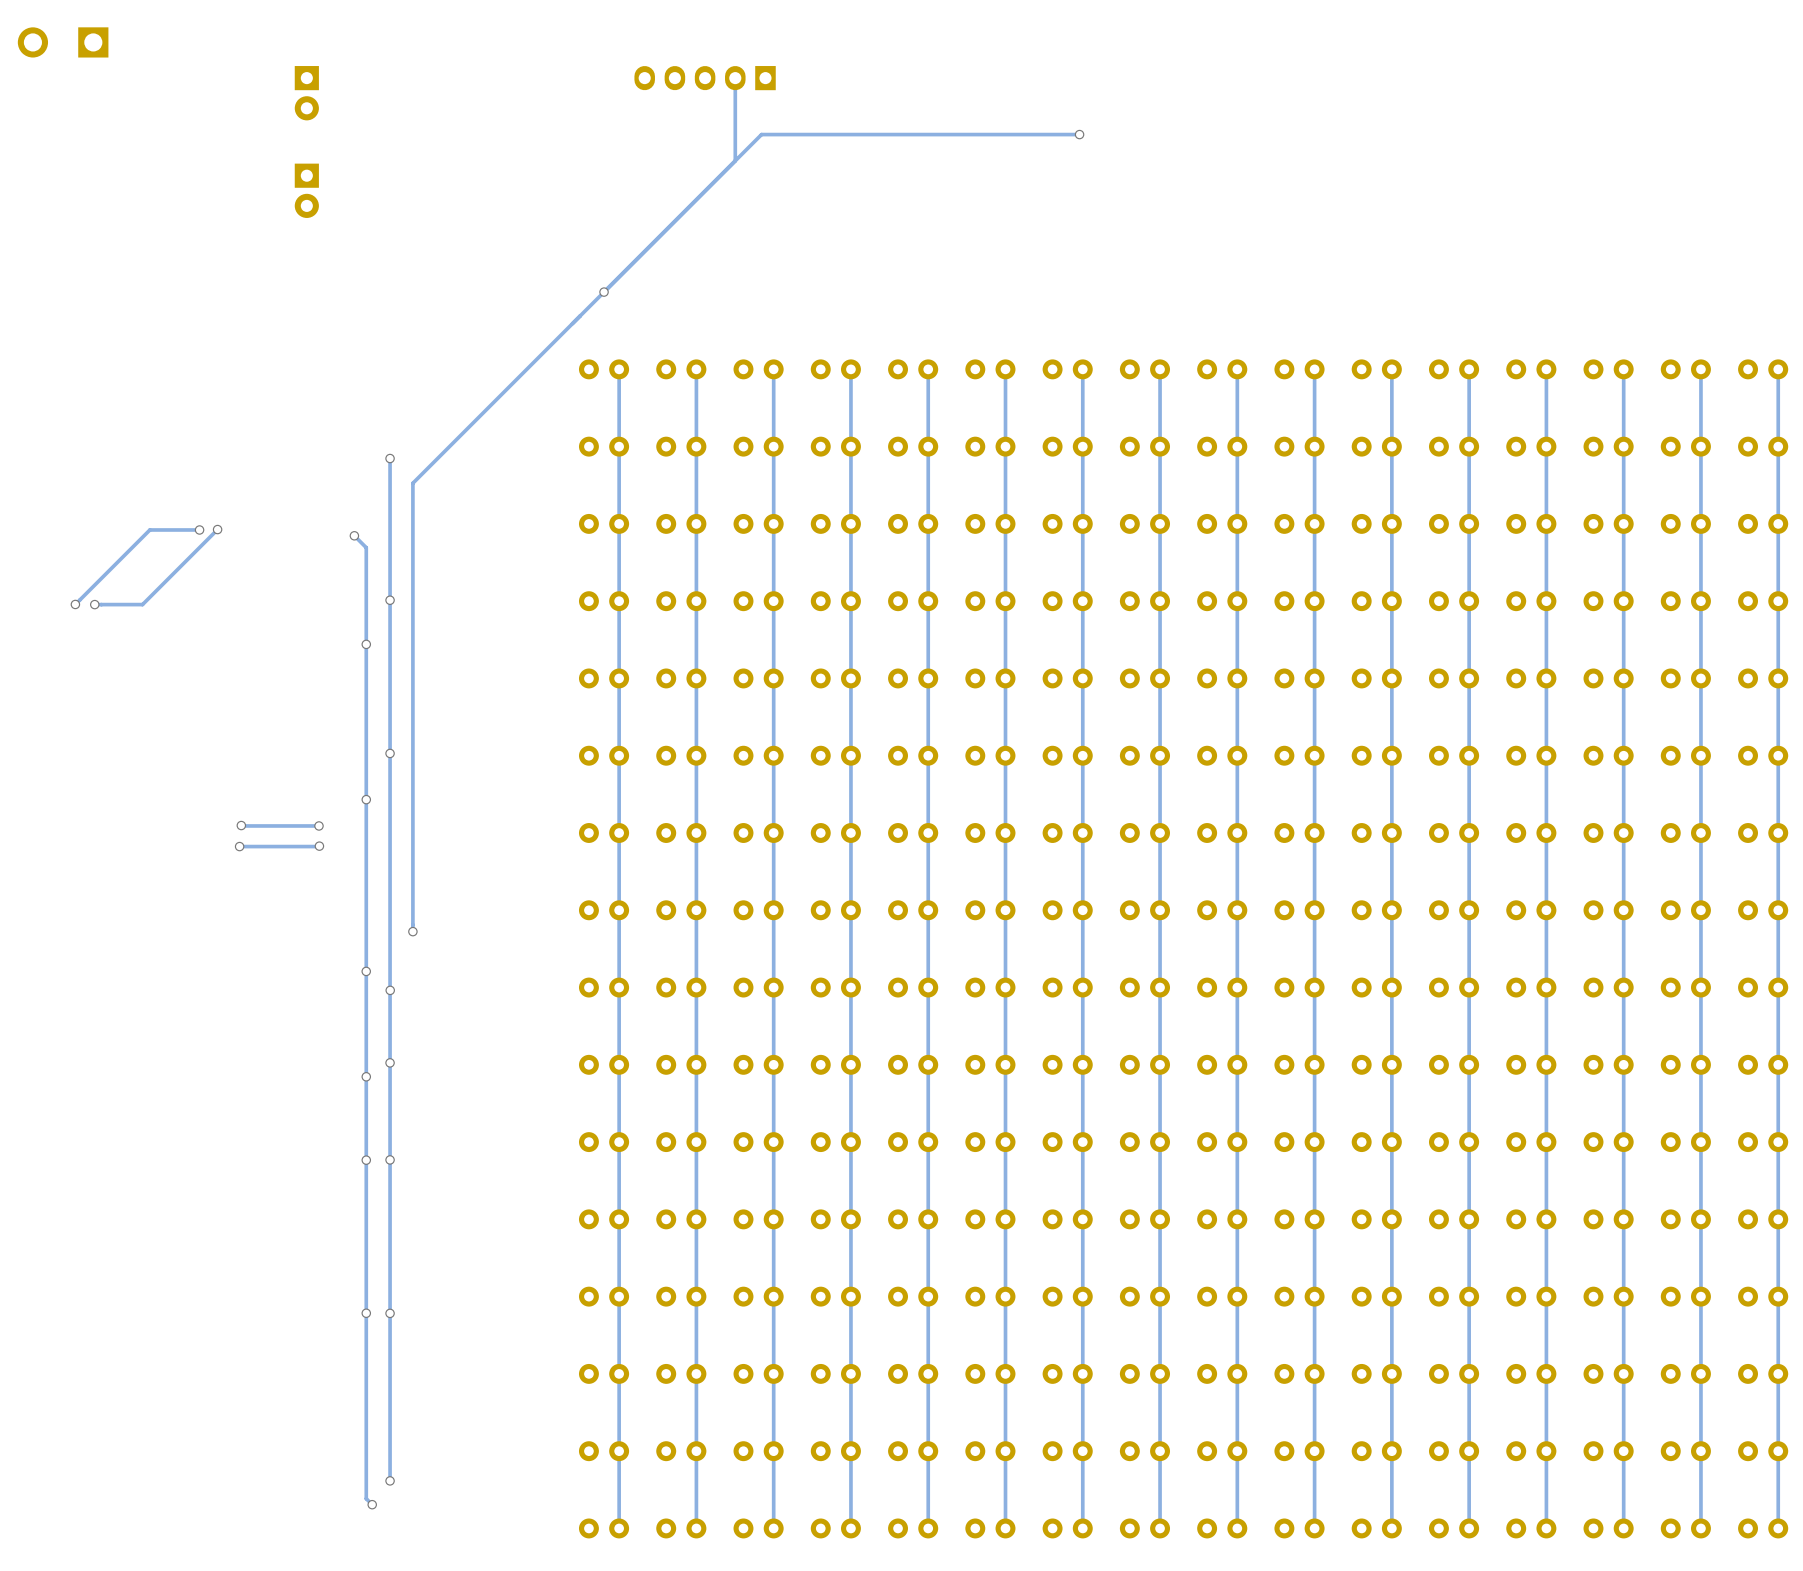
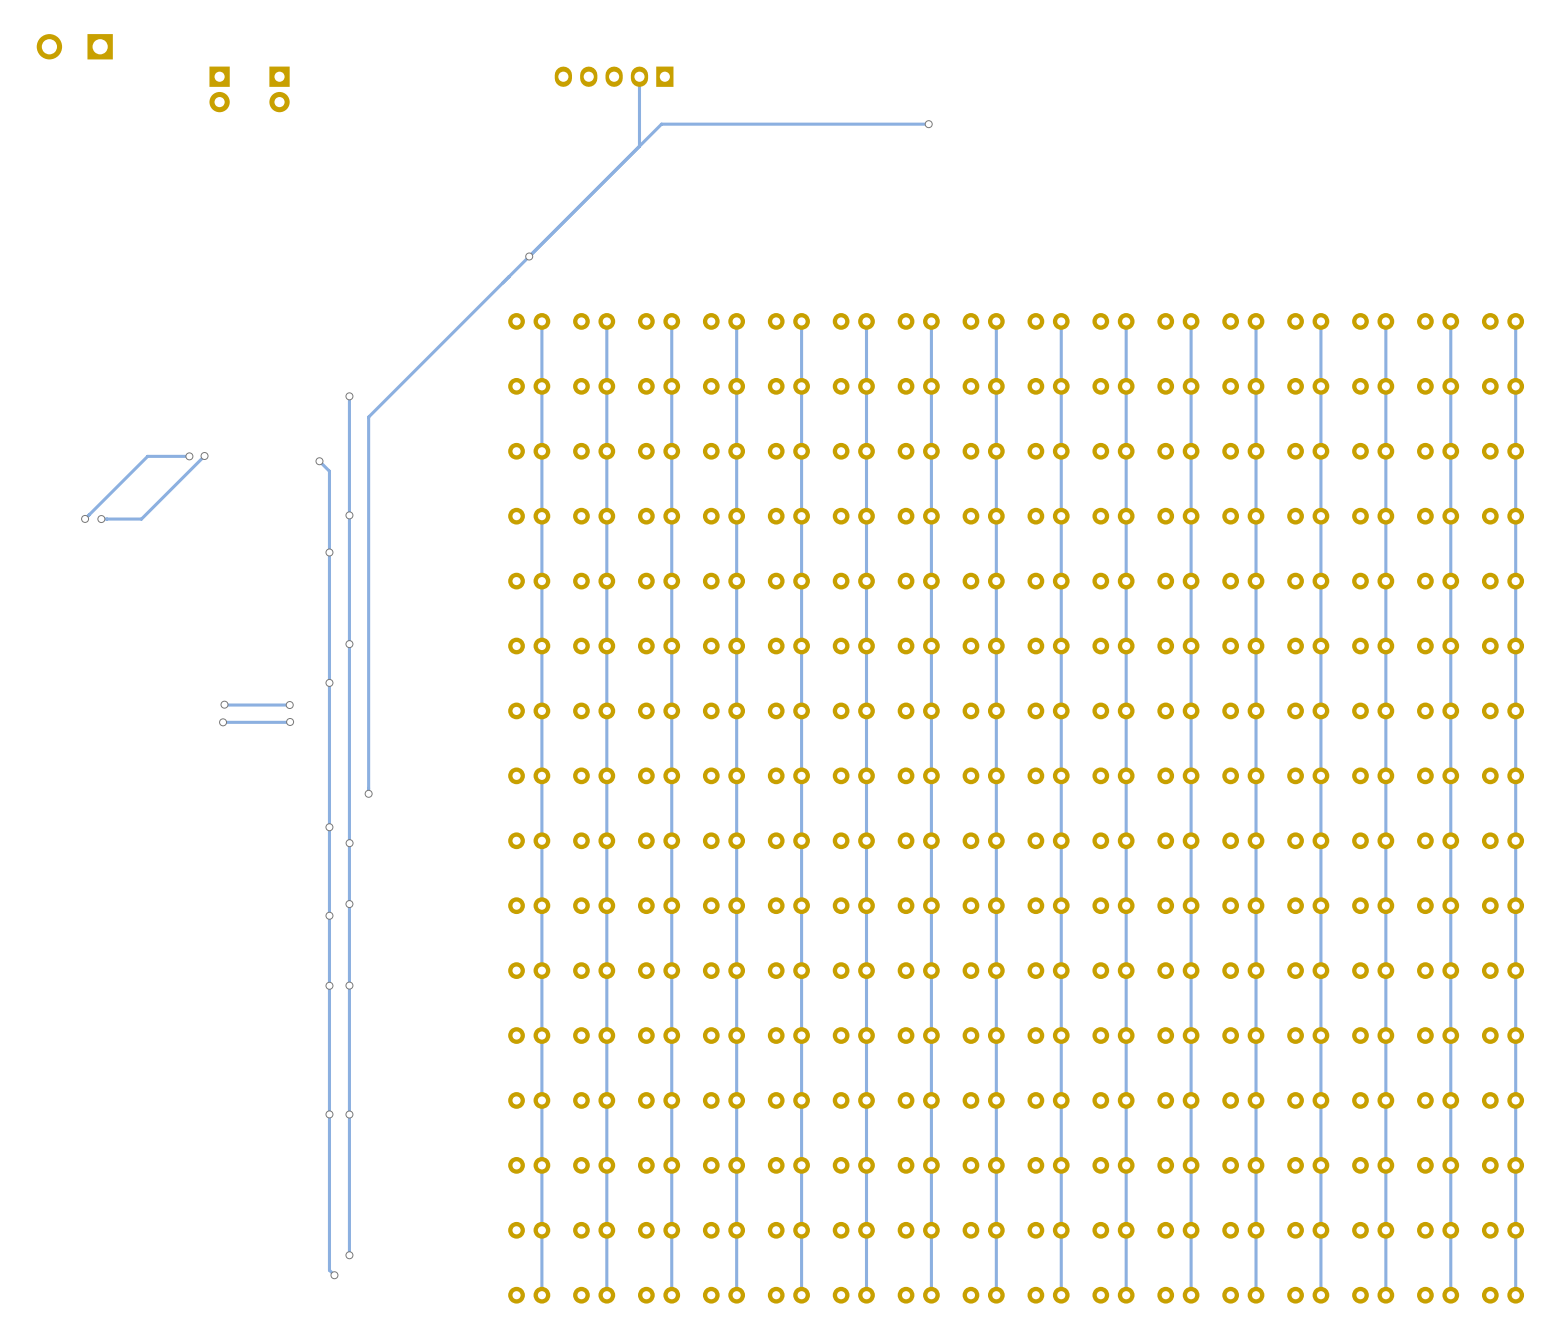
part position: (306, 190) -> (219, 89)

